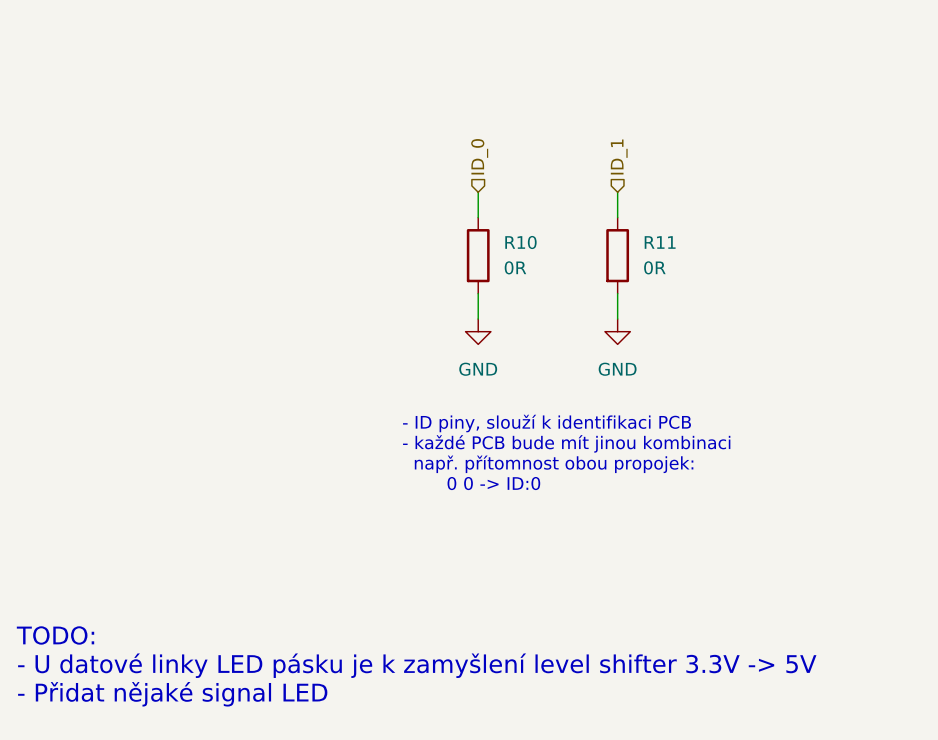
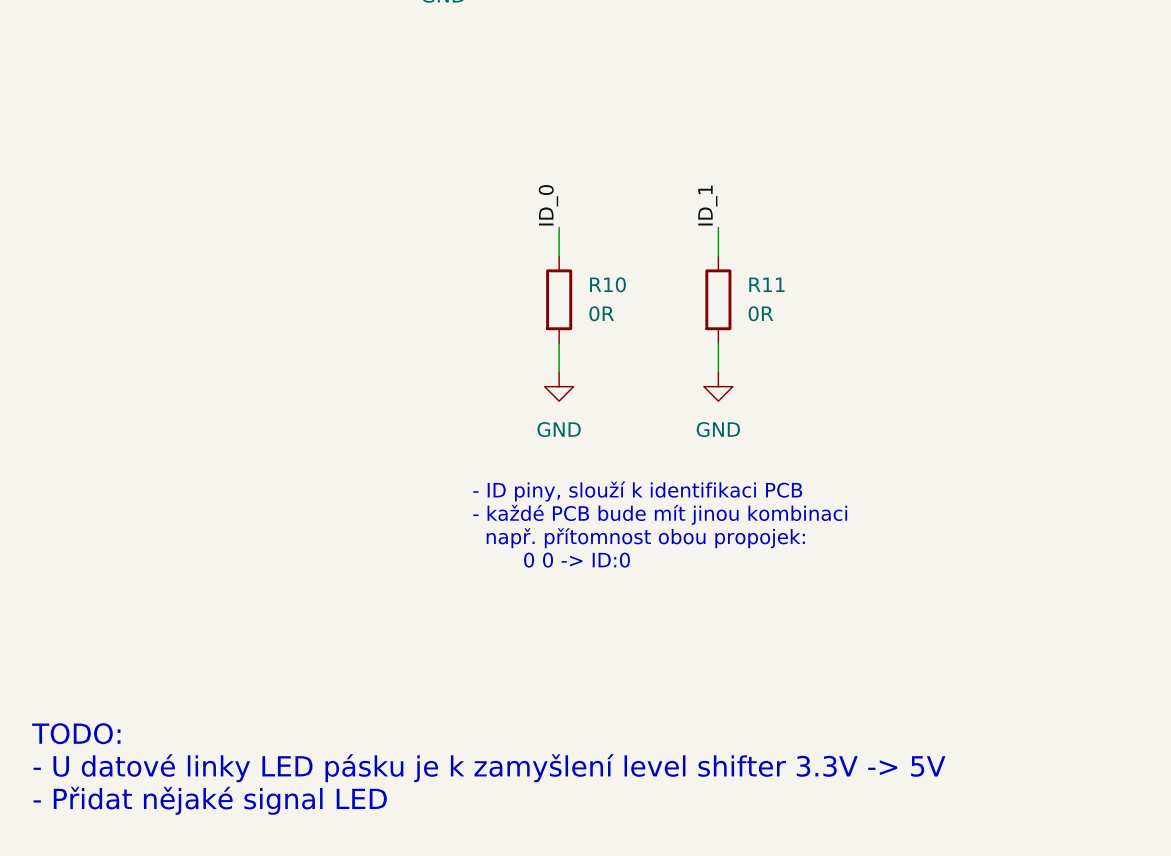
hierarchical label: ID_0 (479, 156) -> none
hierarchical label: ID_1 (619, 156) -> none
label: none -> ID_0 (548, 205)
label: none -> ID_1 (707, 205)

